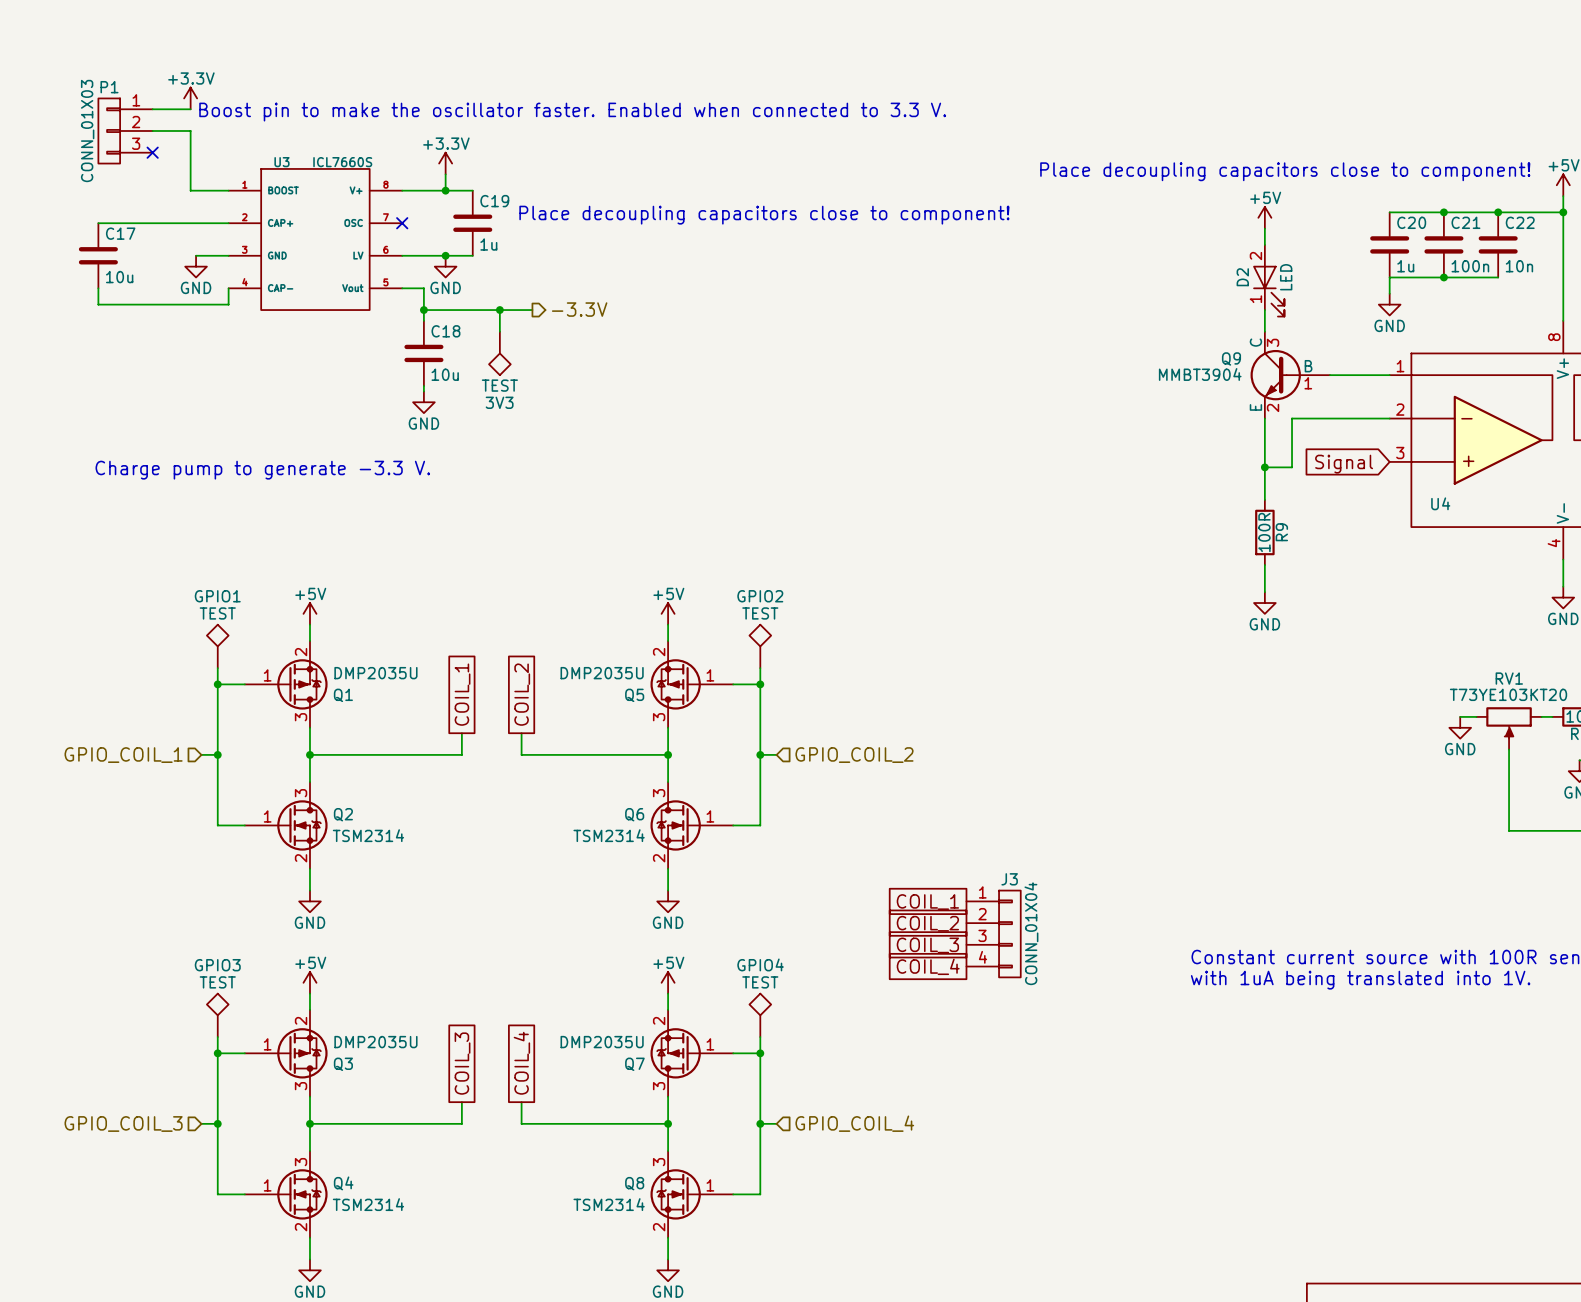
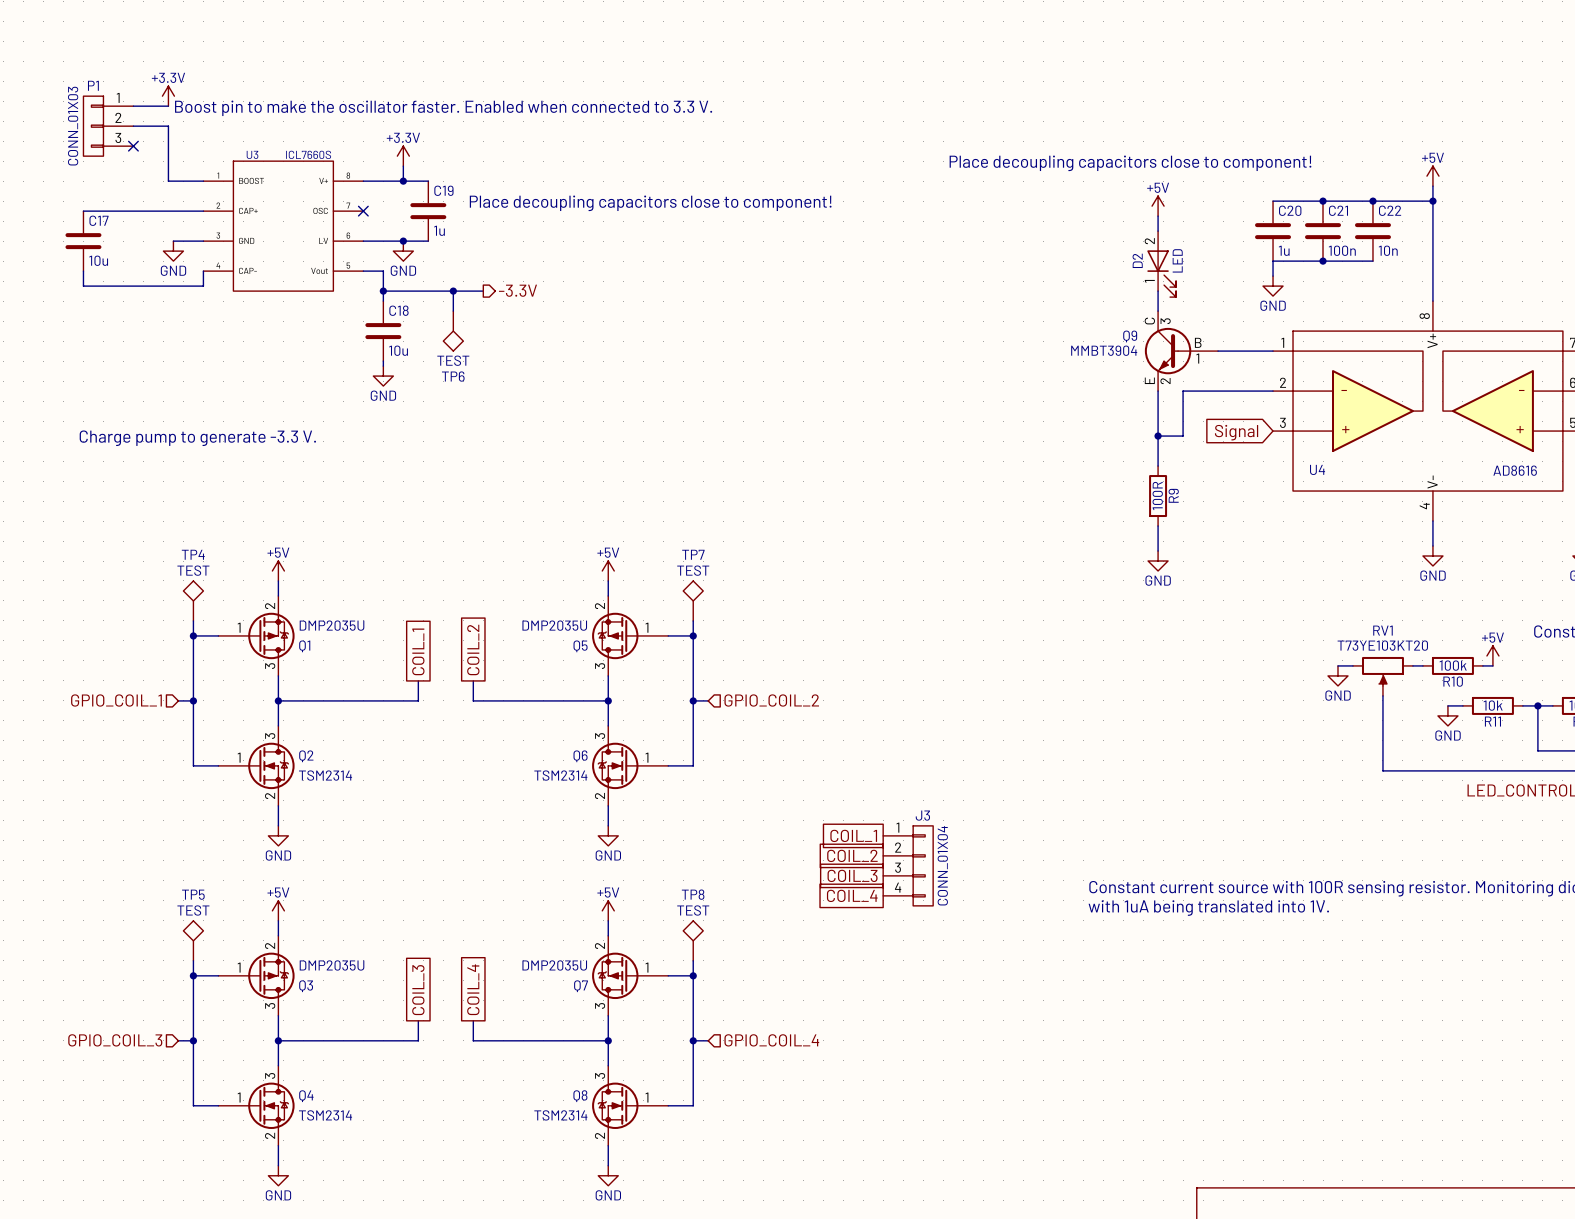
3V3 name: 3V3 (499, 402) -> TP6 (453, 376)
GPIO1 name: GPIO1 (217, 596) -> TP4 (193, 554)
GPIO2 name: GPIO2 (760, 596) -> TP7 (693, 554)
GPIO4 name: GPIO4 (760, 964) -> TP8 (693, 894)
GPIO3 name: GPIO3 (217, 965) -> TP5 (193, 894)

